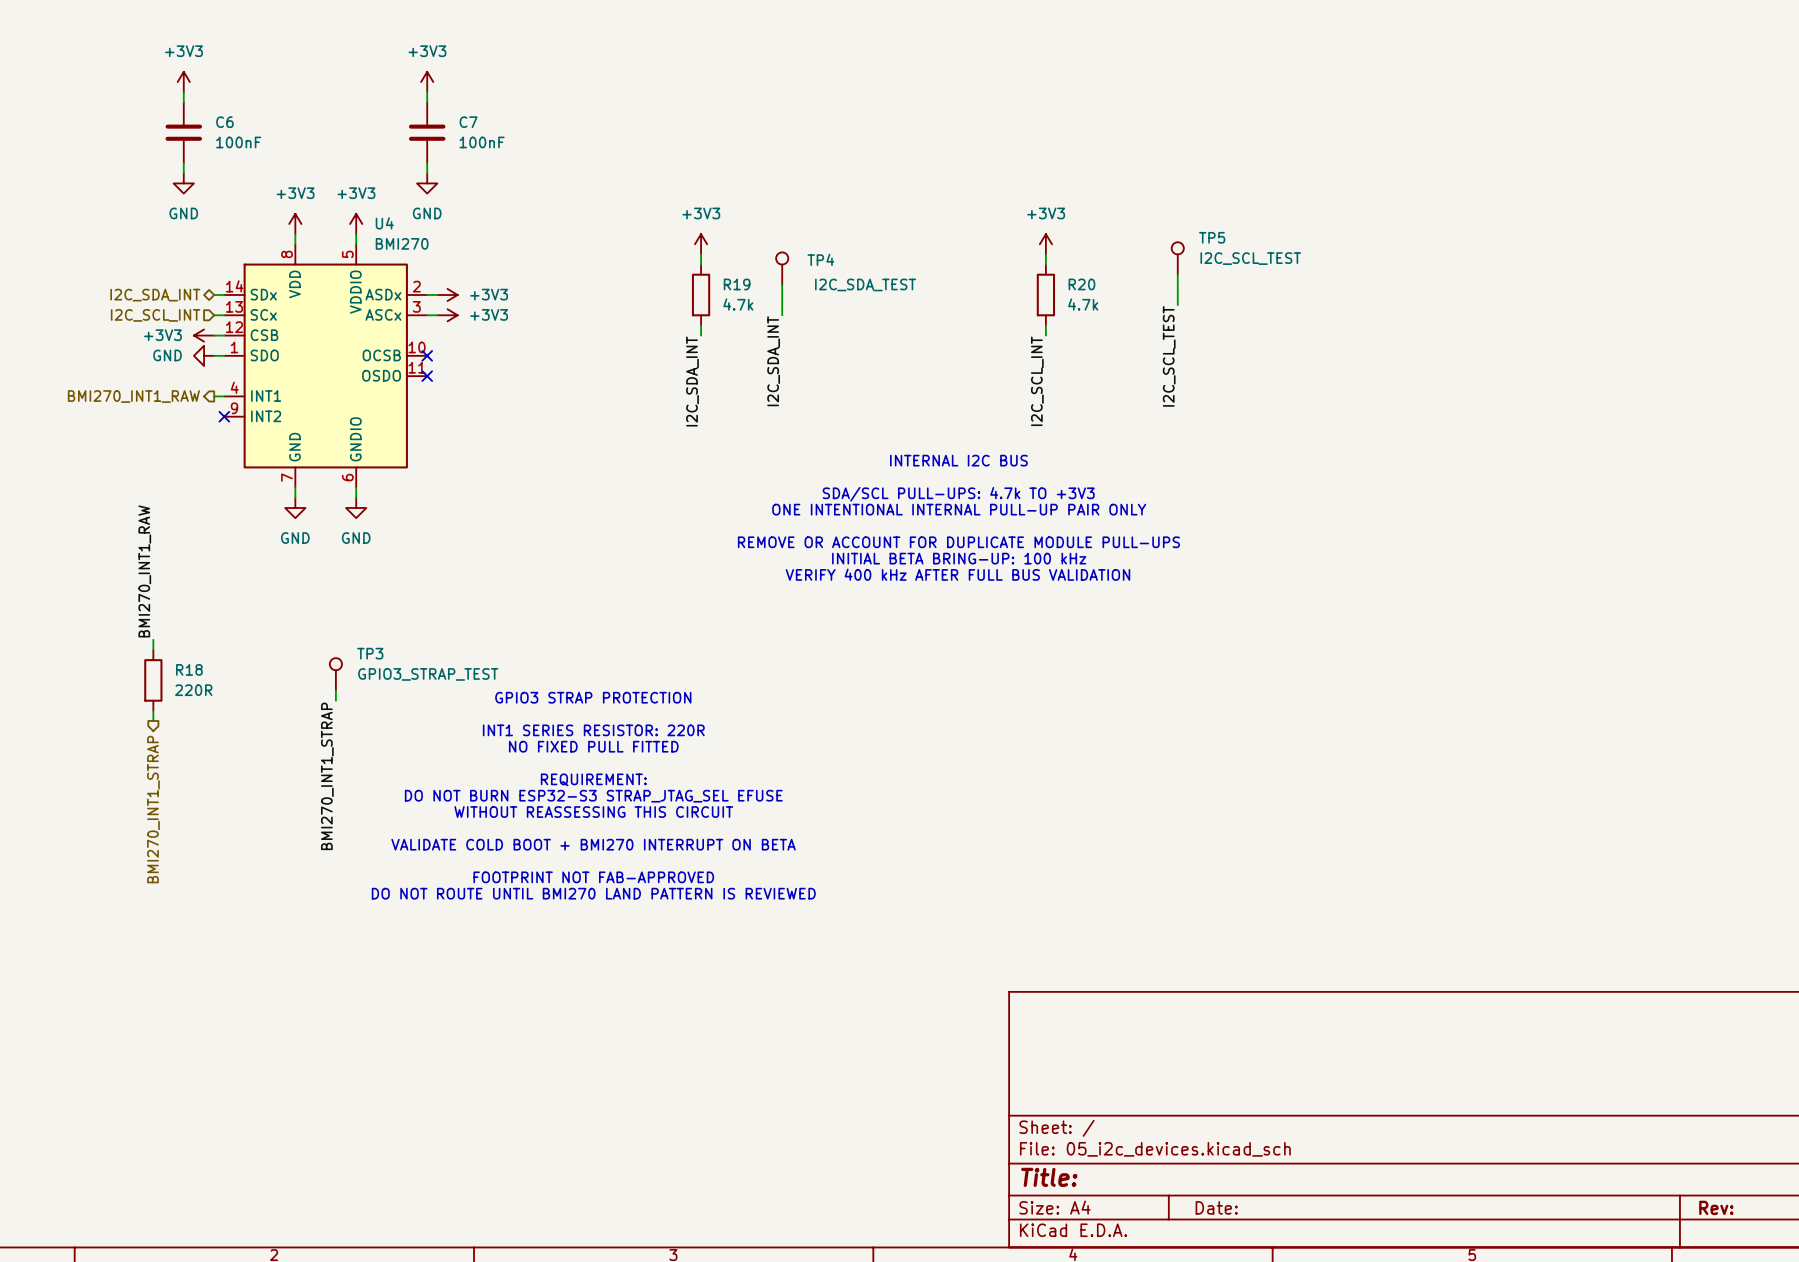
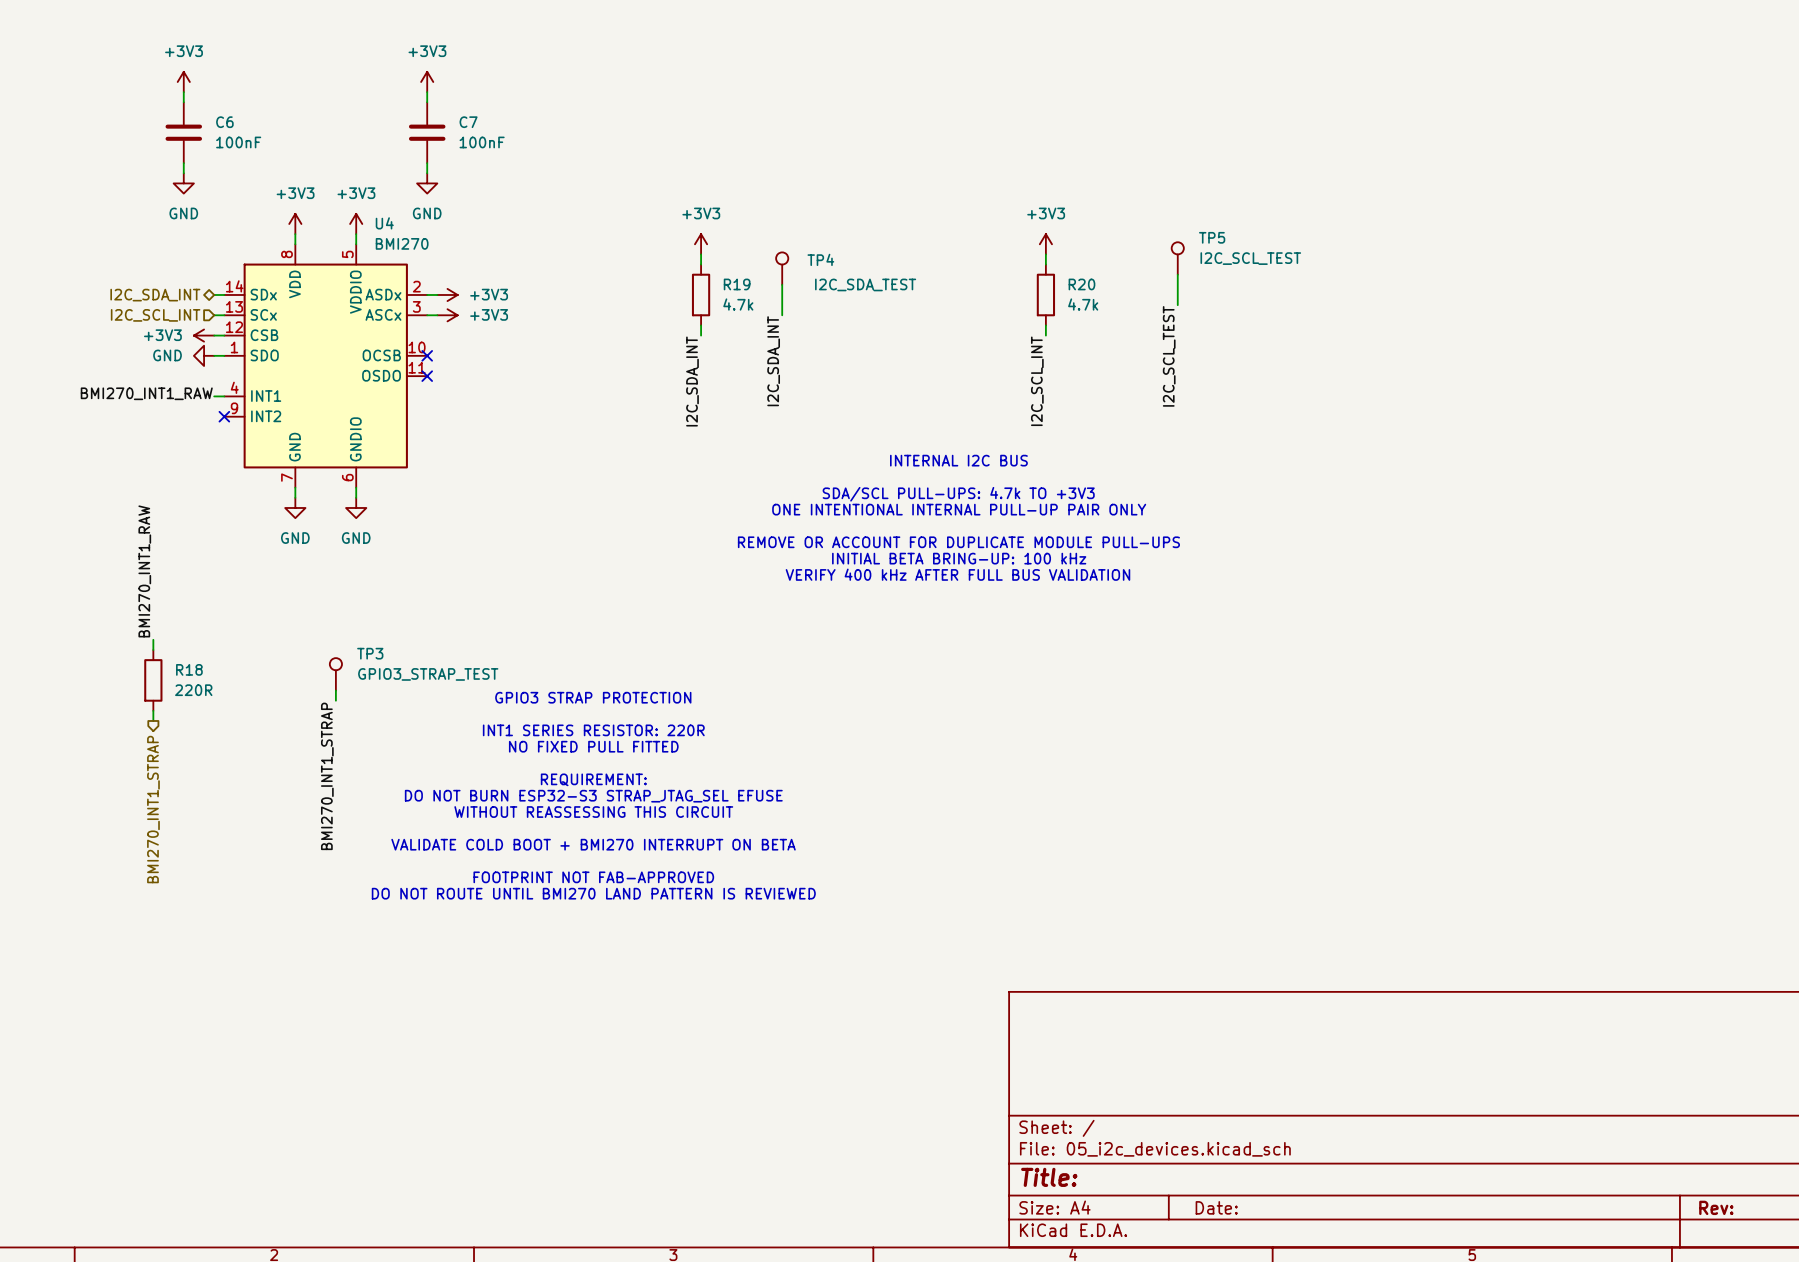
label: none -> BMI270_INT1_RAW (146, 393)
hierarchical label: BMI270_INT1_RAW (133, 396) -> none

